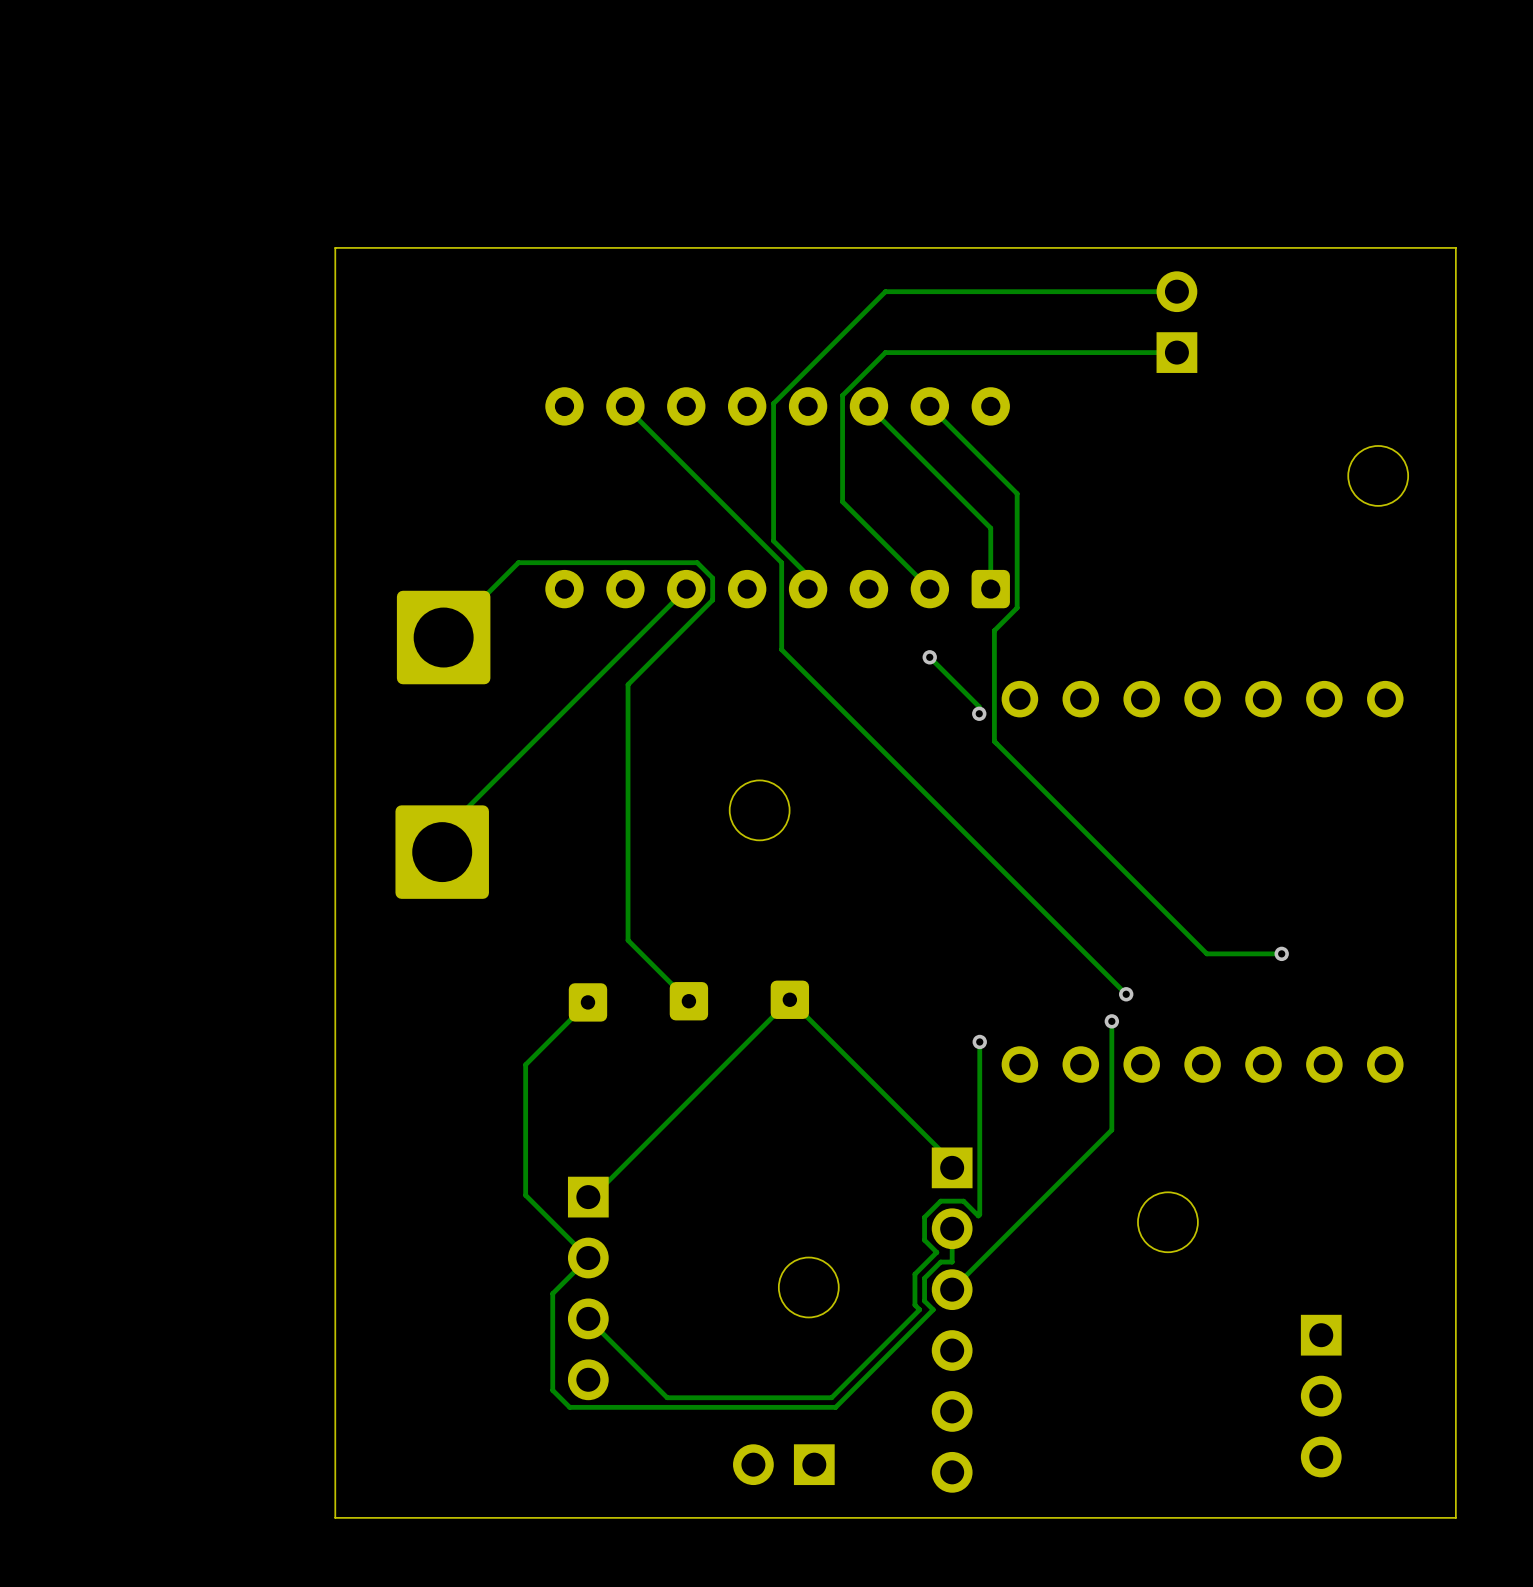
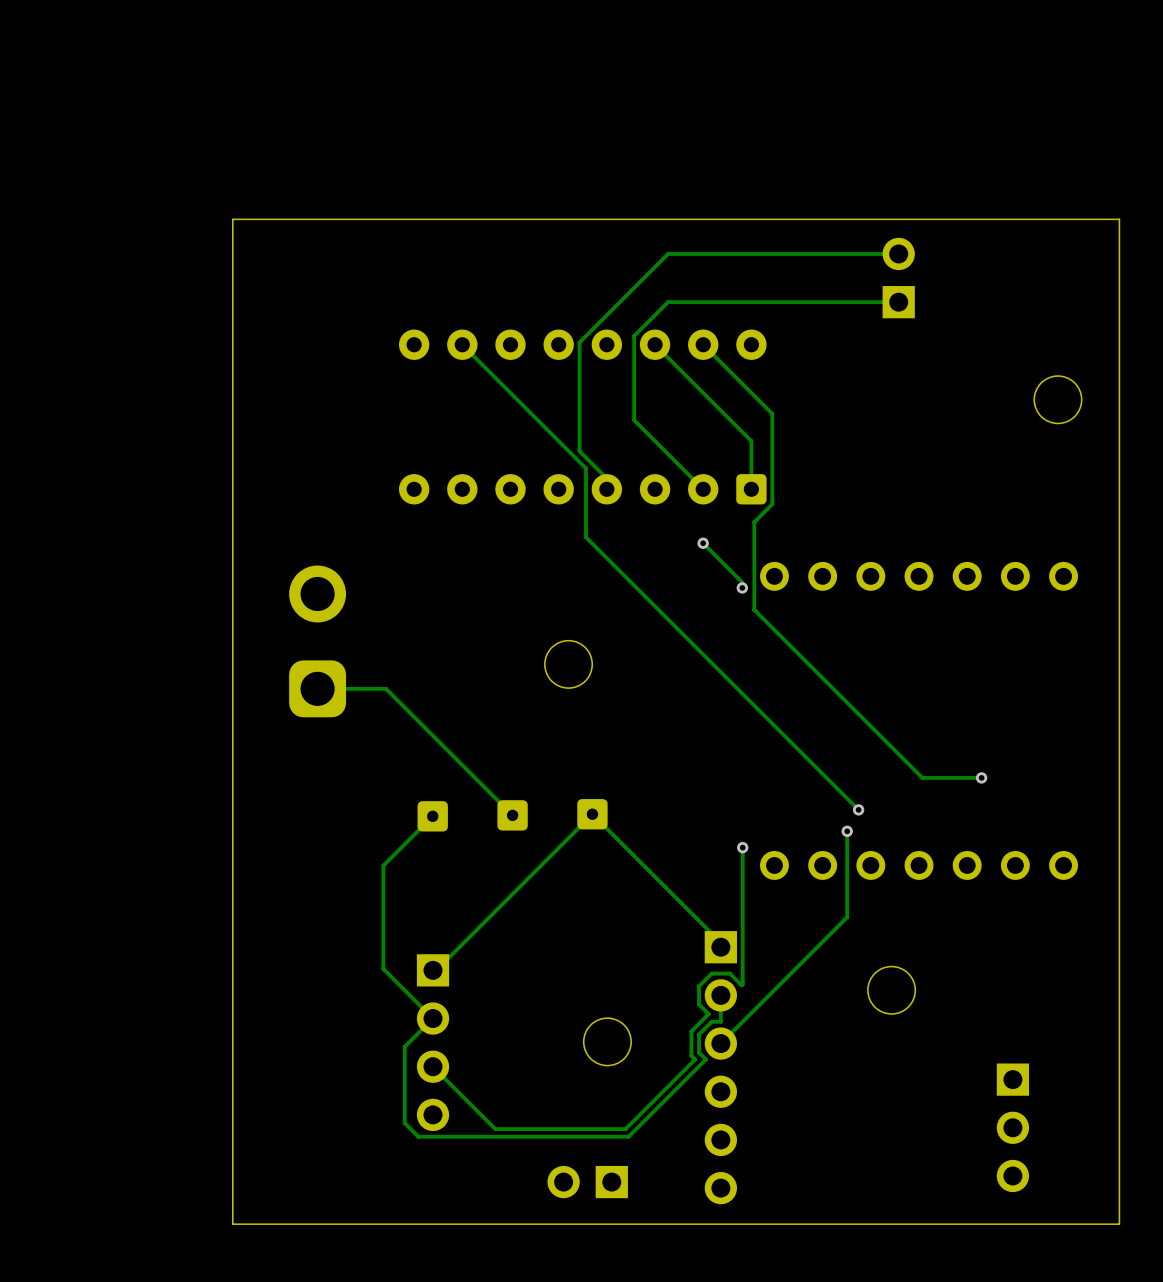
track: (686, 589) (426, 849) (400, 849) -> none
track: (443, 637) (518, 562) (697, 562) (712, 578) (712, 600) (628, 684) (628, 940) -> (317, 688) (386, 688) (464, 767)
part: (443, 637) -> none
part: none -> (317, 641)
part: (442, 852) -> none

